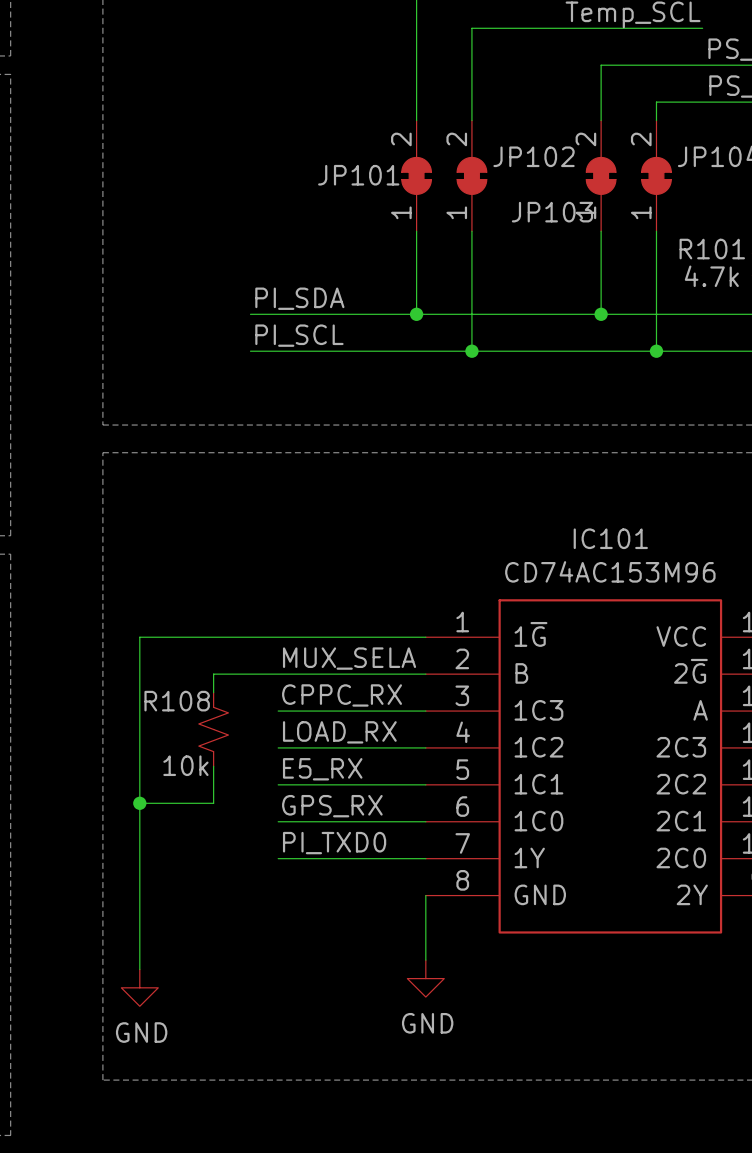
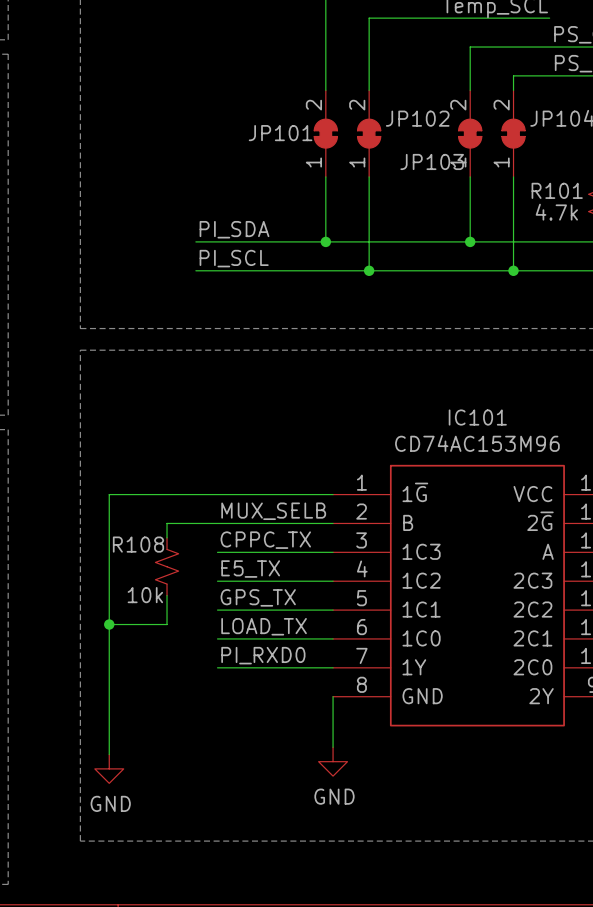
label: MUX_SELA (349, 658) -> MUX_SELB (273, 511)
label: CPPC_RX (342, 695) -> CPPC_TX (265, 540)
label: LOAD_RX (339, 732) -> E5_TX (250, 569)
label: E5_RX (322, 769) -> GPS_TX (258, 597)
label: GPS_RX (332, 806) -> LOAD_TX (264, 626)
label: PI_TXD0 (334, 843) -> PI_RXD0 (263, 655)

